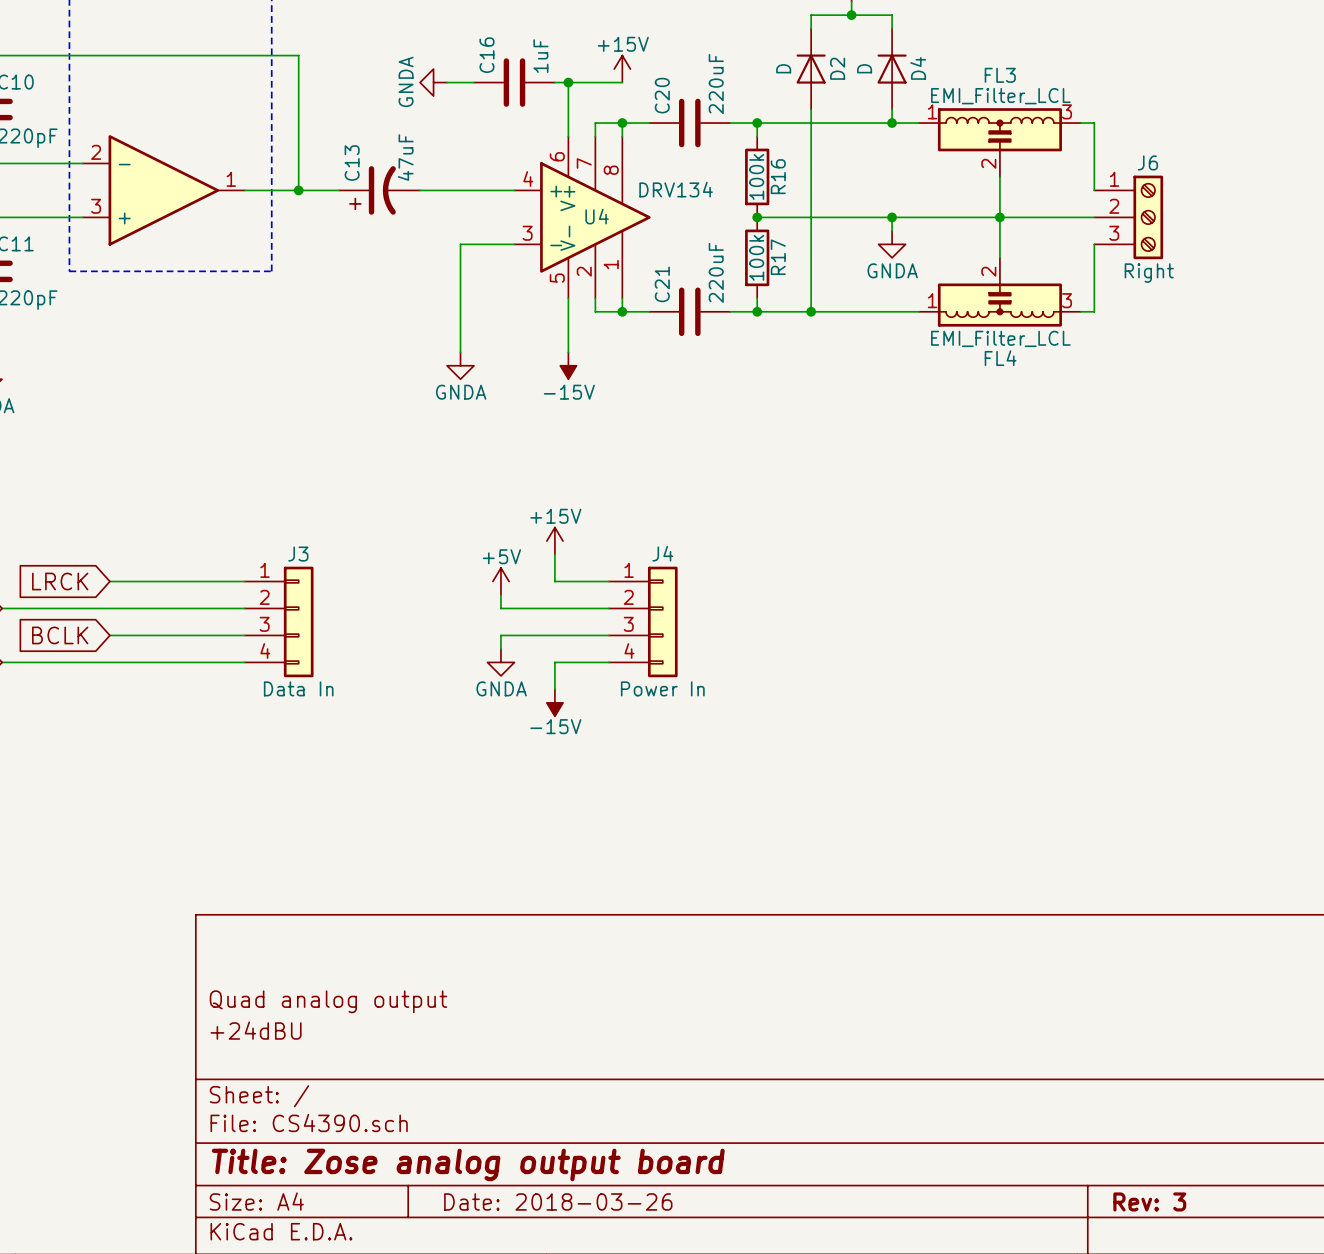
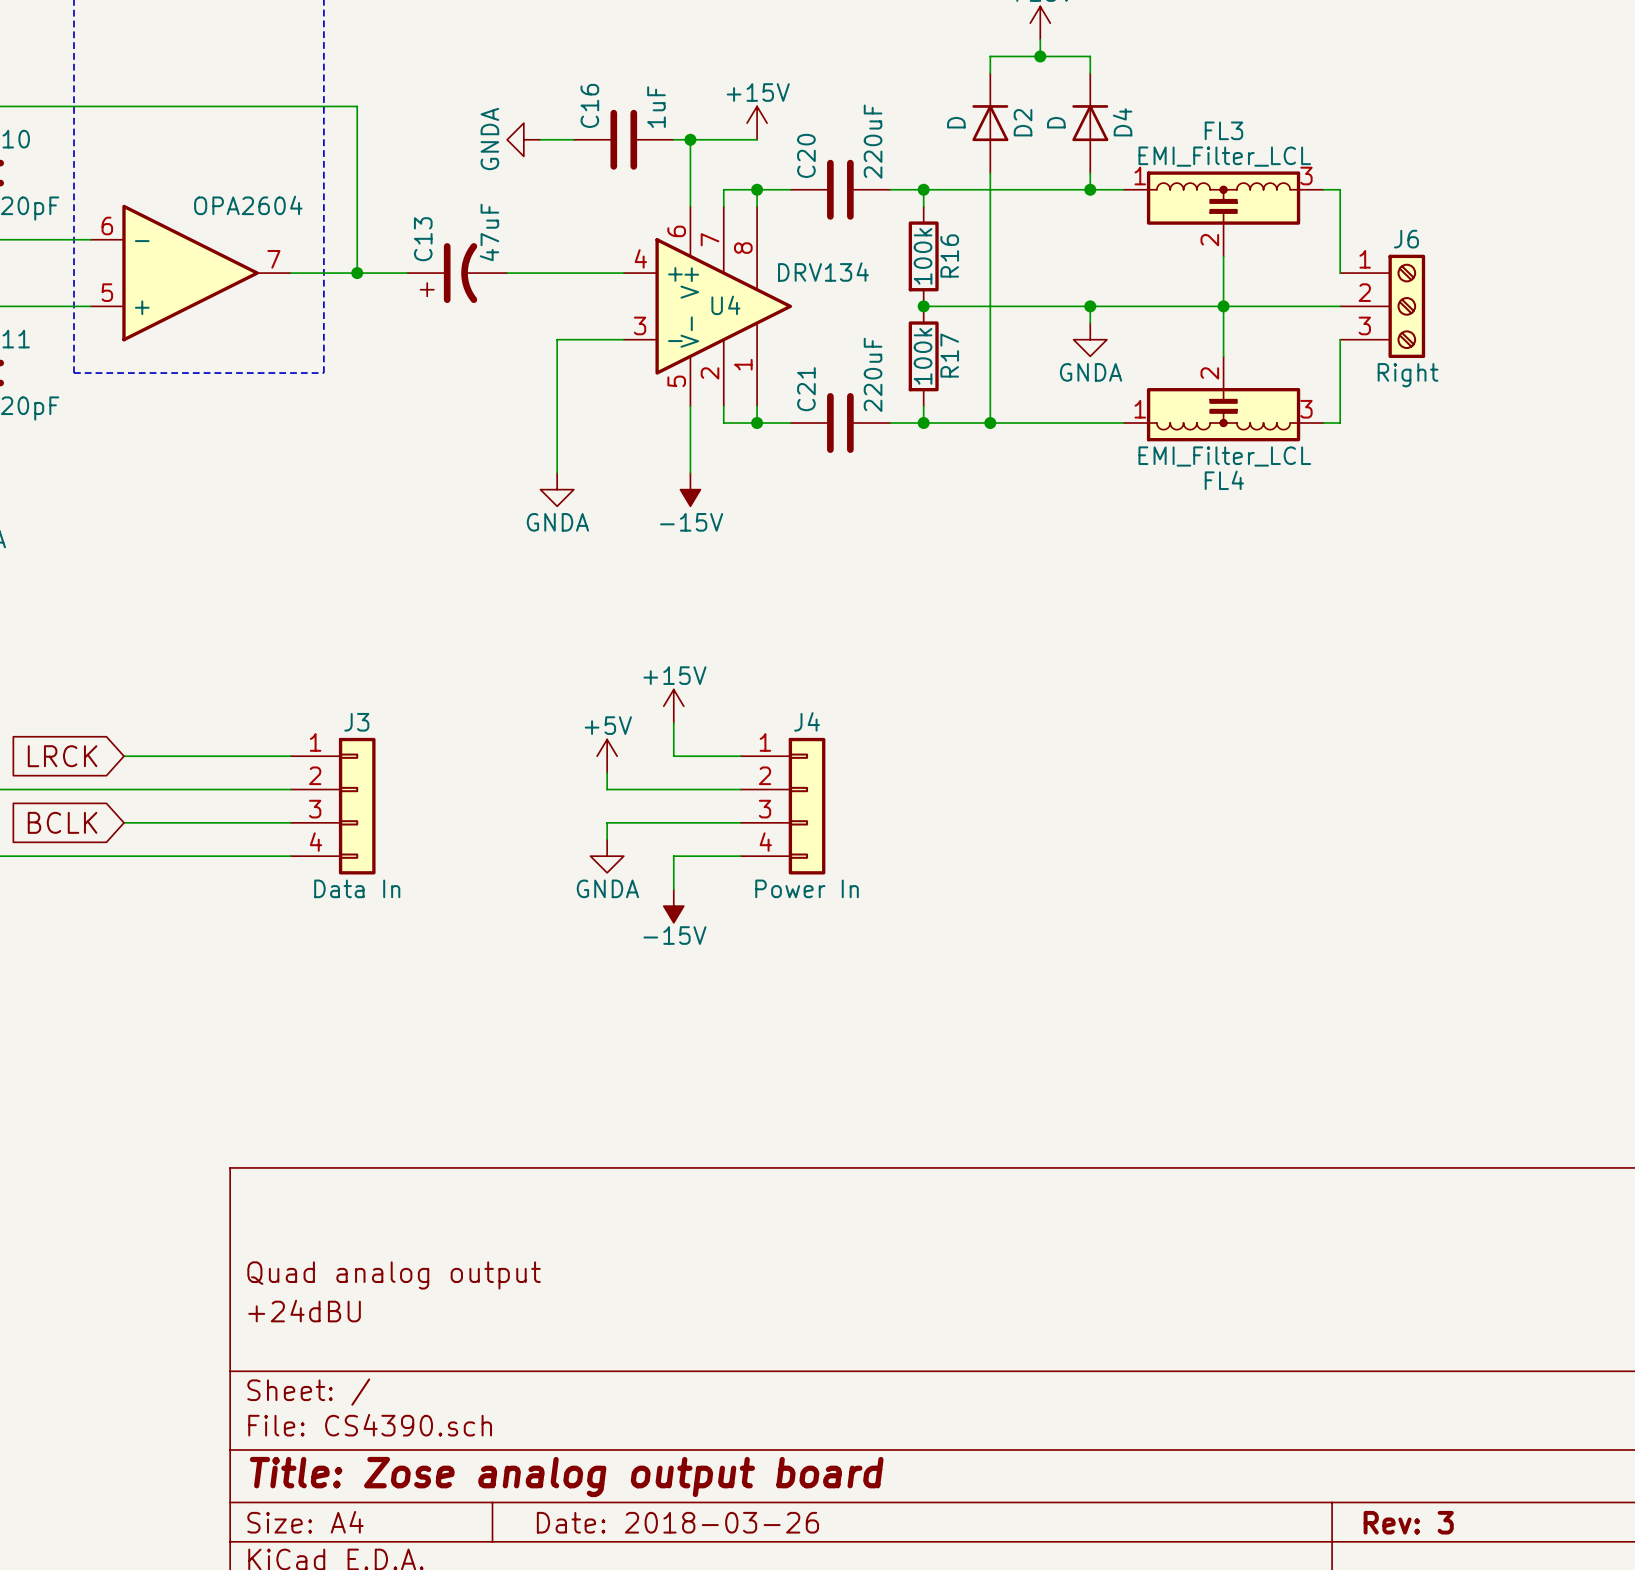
part value: none -> OPA2604 (248, 205)
part pin number: 2 (96, 152) -> 6 (107, 225)
part pin number: 1 (231, 179) -> 7 (273, 259)
part pin number: 3 (96, 206) -> 5 (107, 292)

